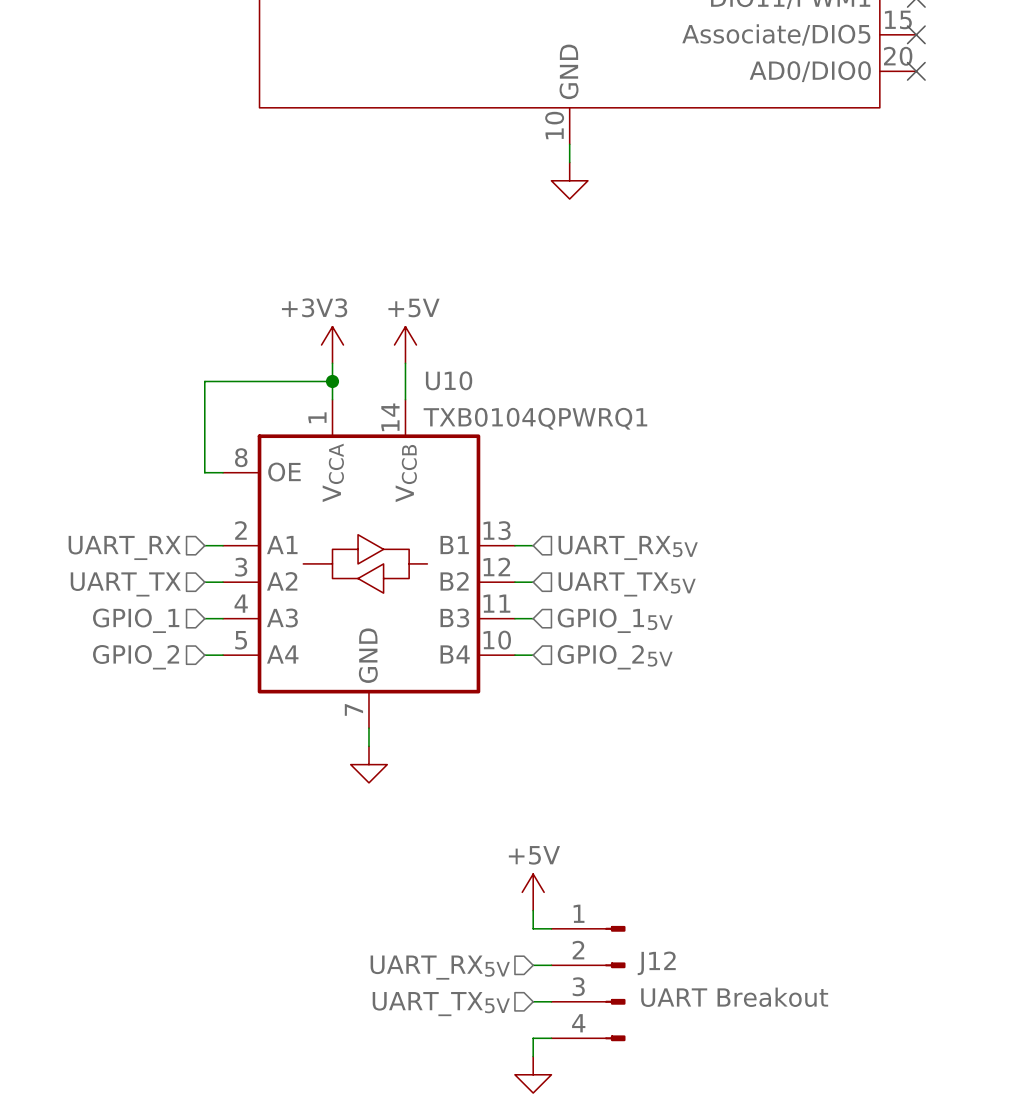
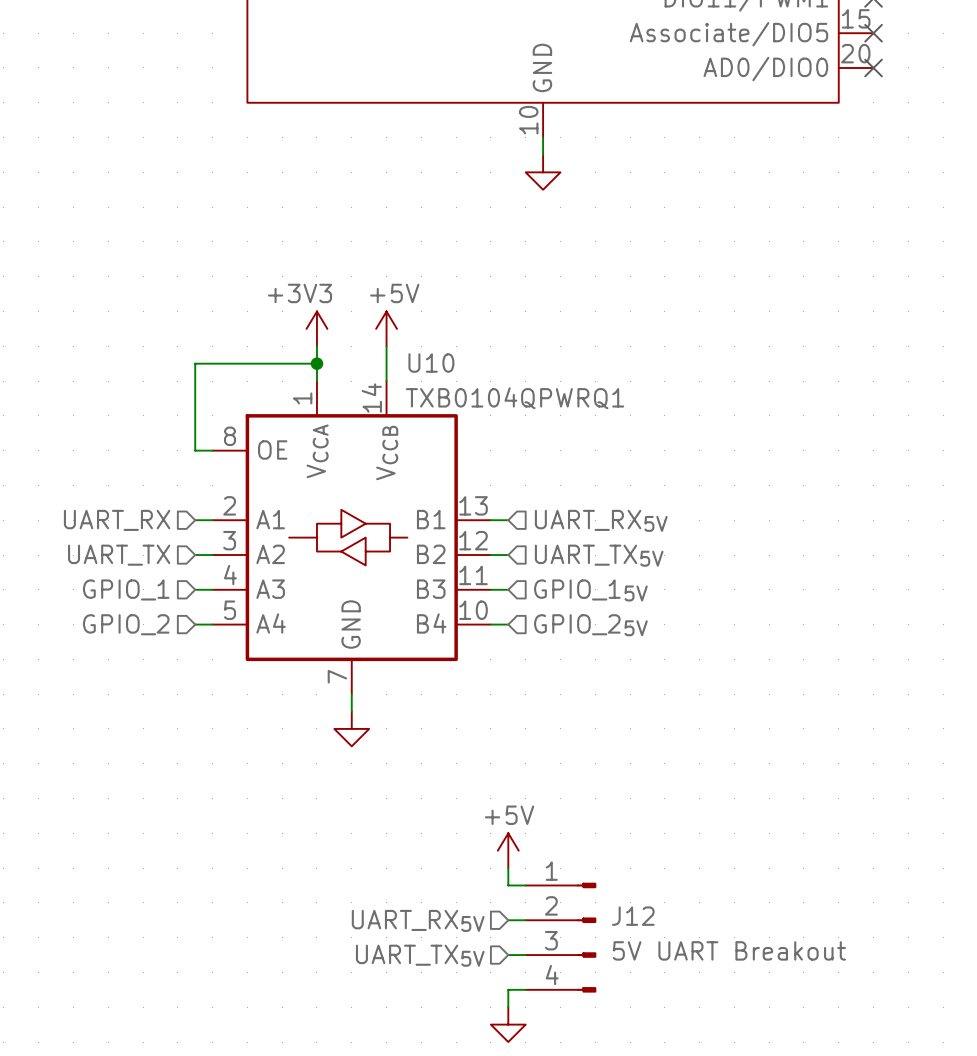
J12 value: UART Breakout (734, 997) -> 5V UART Breakout (729, 950)

